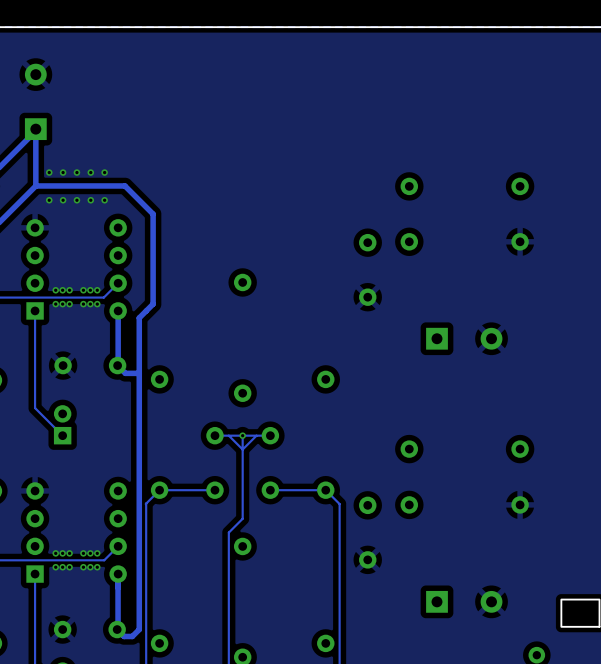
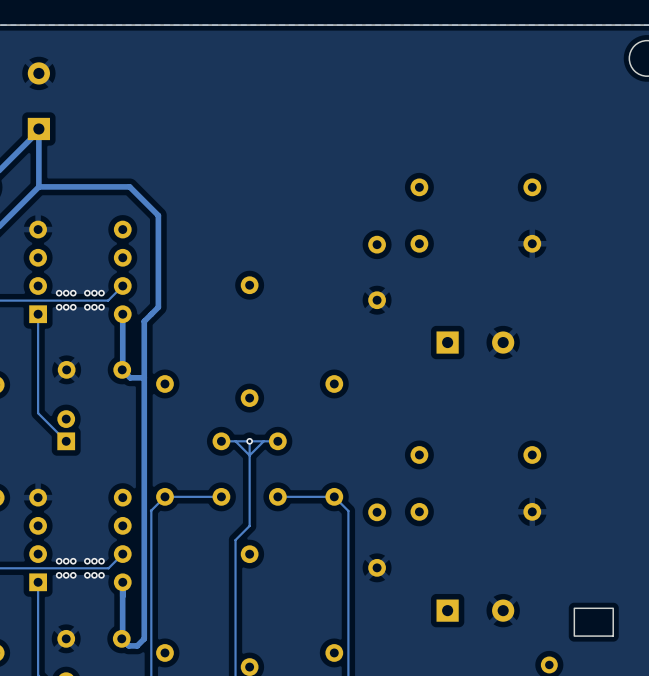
via: (49, 172) -> none
via: (63, 172) -> none
via: (76, 172) -> none
via: (90, 172) -> none
via: (104, 172) -> none
via: (49, 200) -> none
via: (63, 200) -> none
via: (76, 200) -> none
via: (90, 200) -> none
via: (104, 200) -> none

